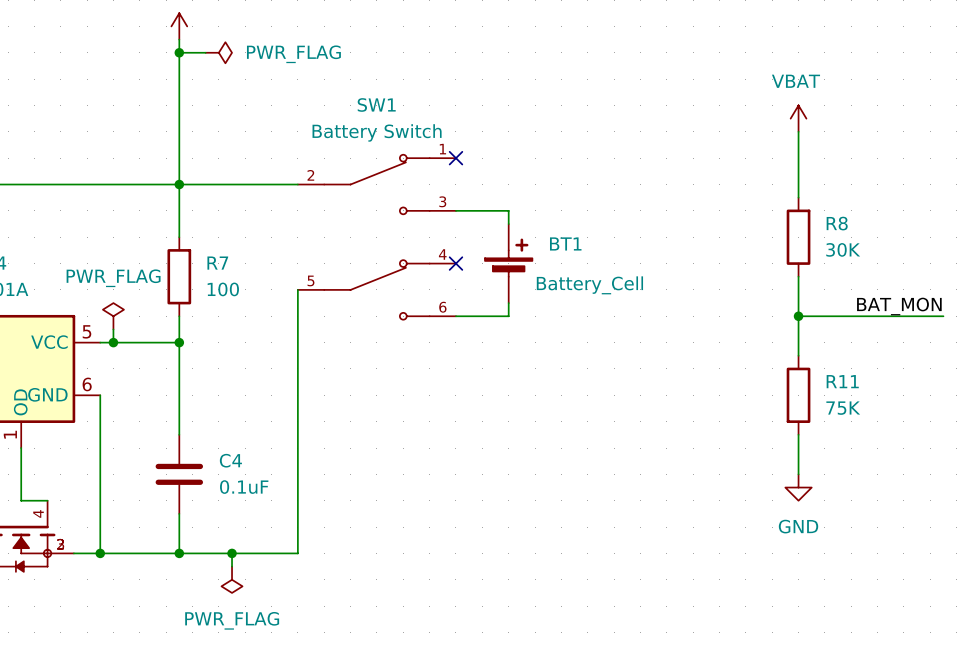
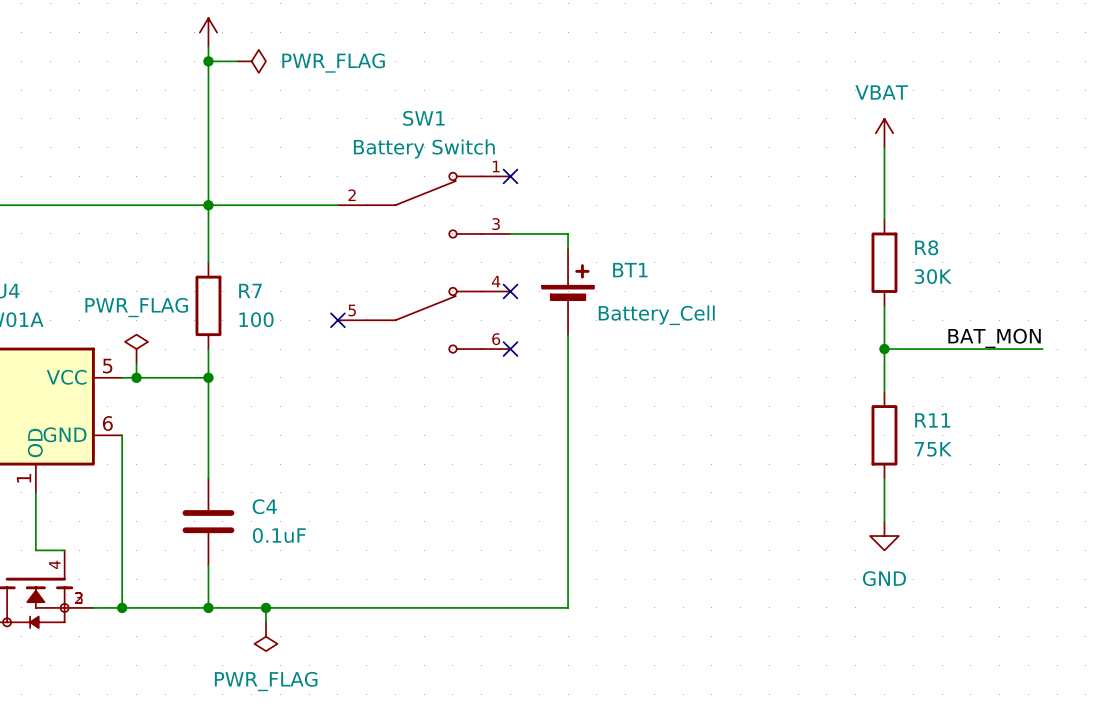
wire: (297, 289) (297, 553) -> (568, 349) (568, 607) (337, 607)
no-connect mark: none -> (337, 320)
wire: (455, 316) (508, 316) -> none
no-connect mark: none -> (510, 349)

